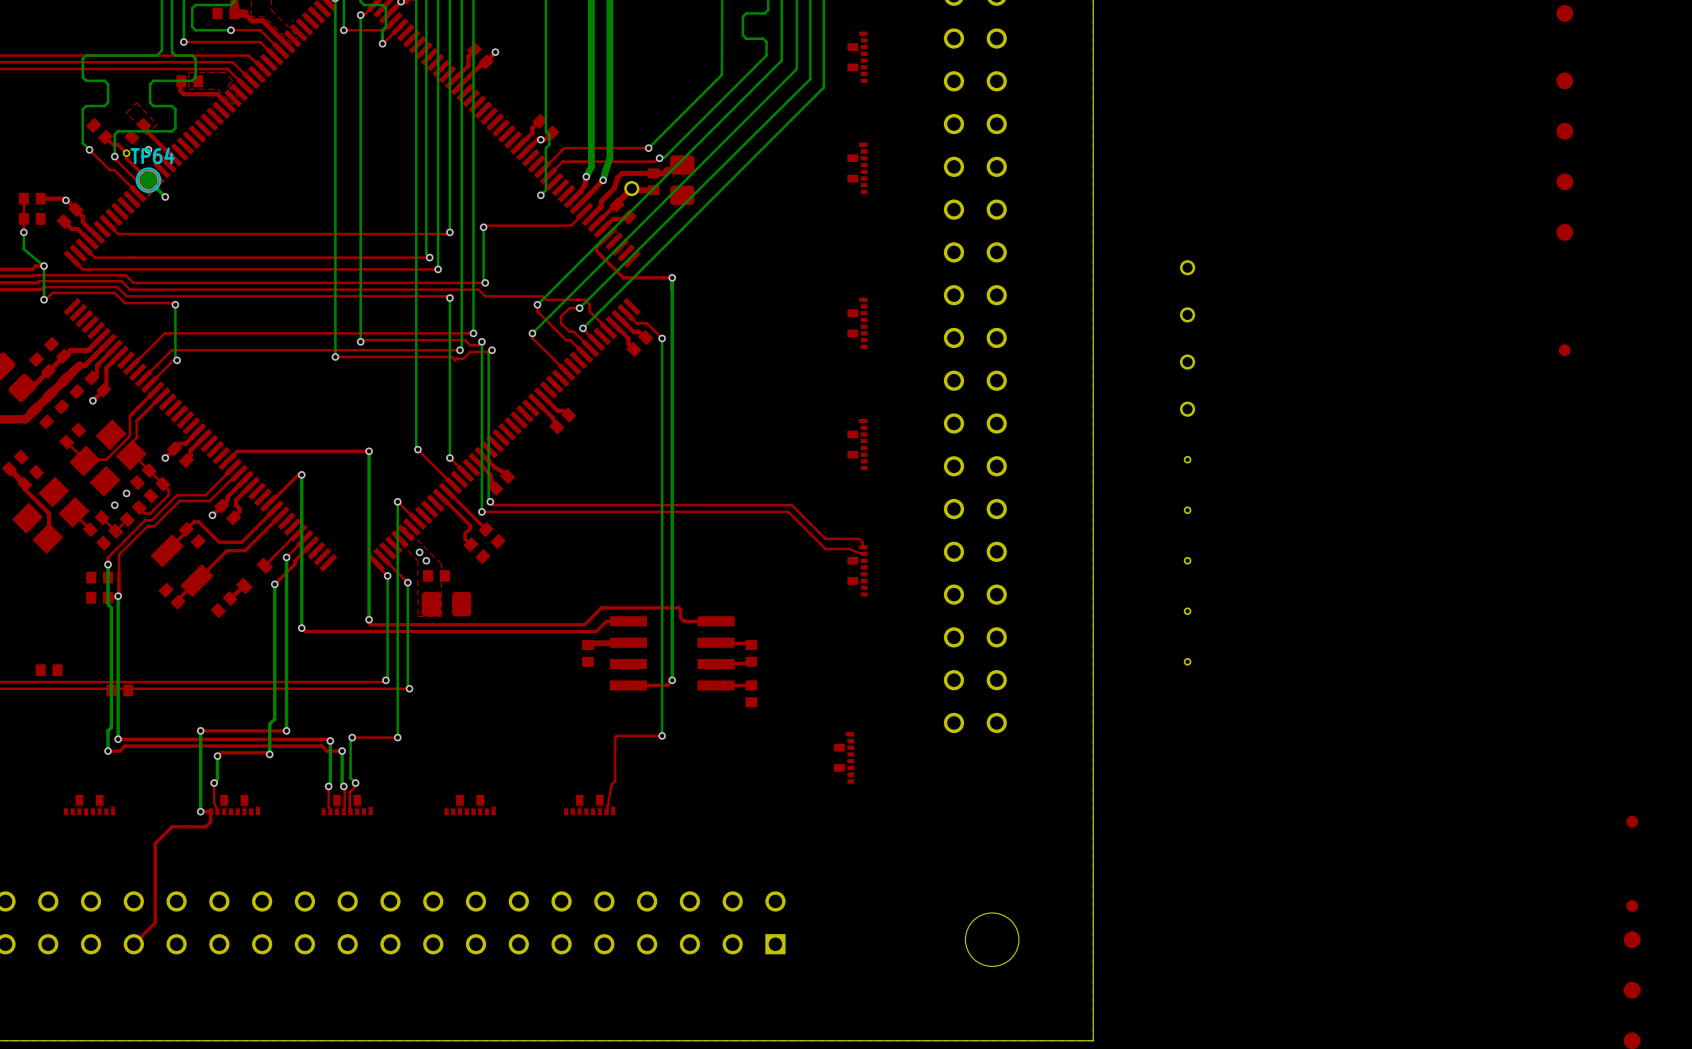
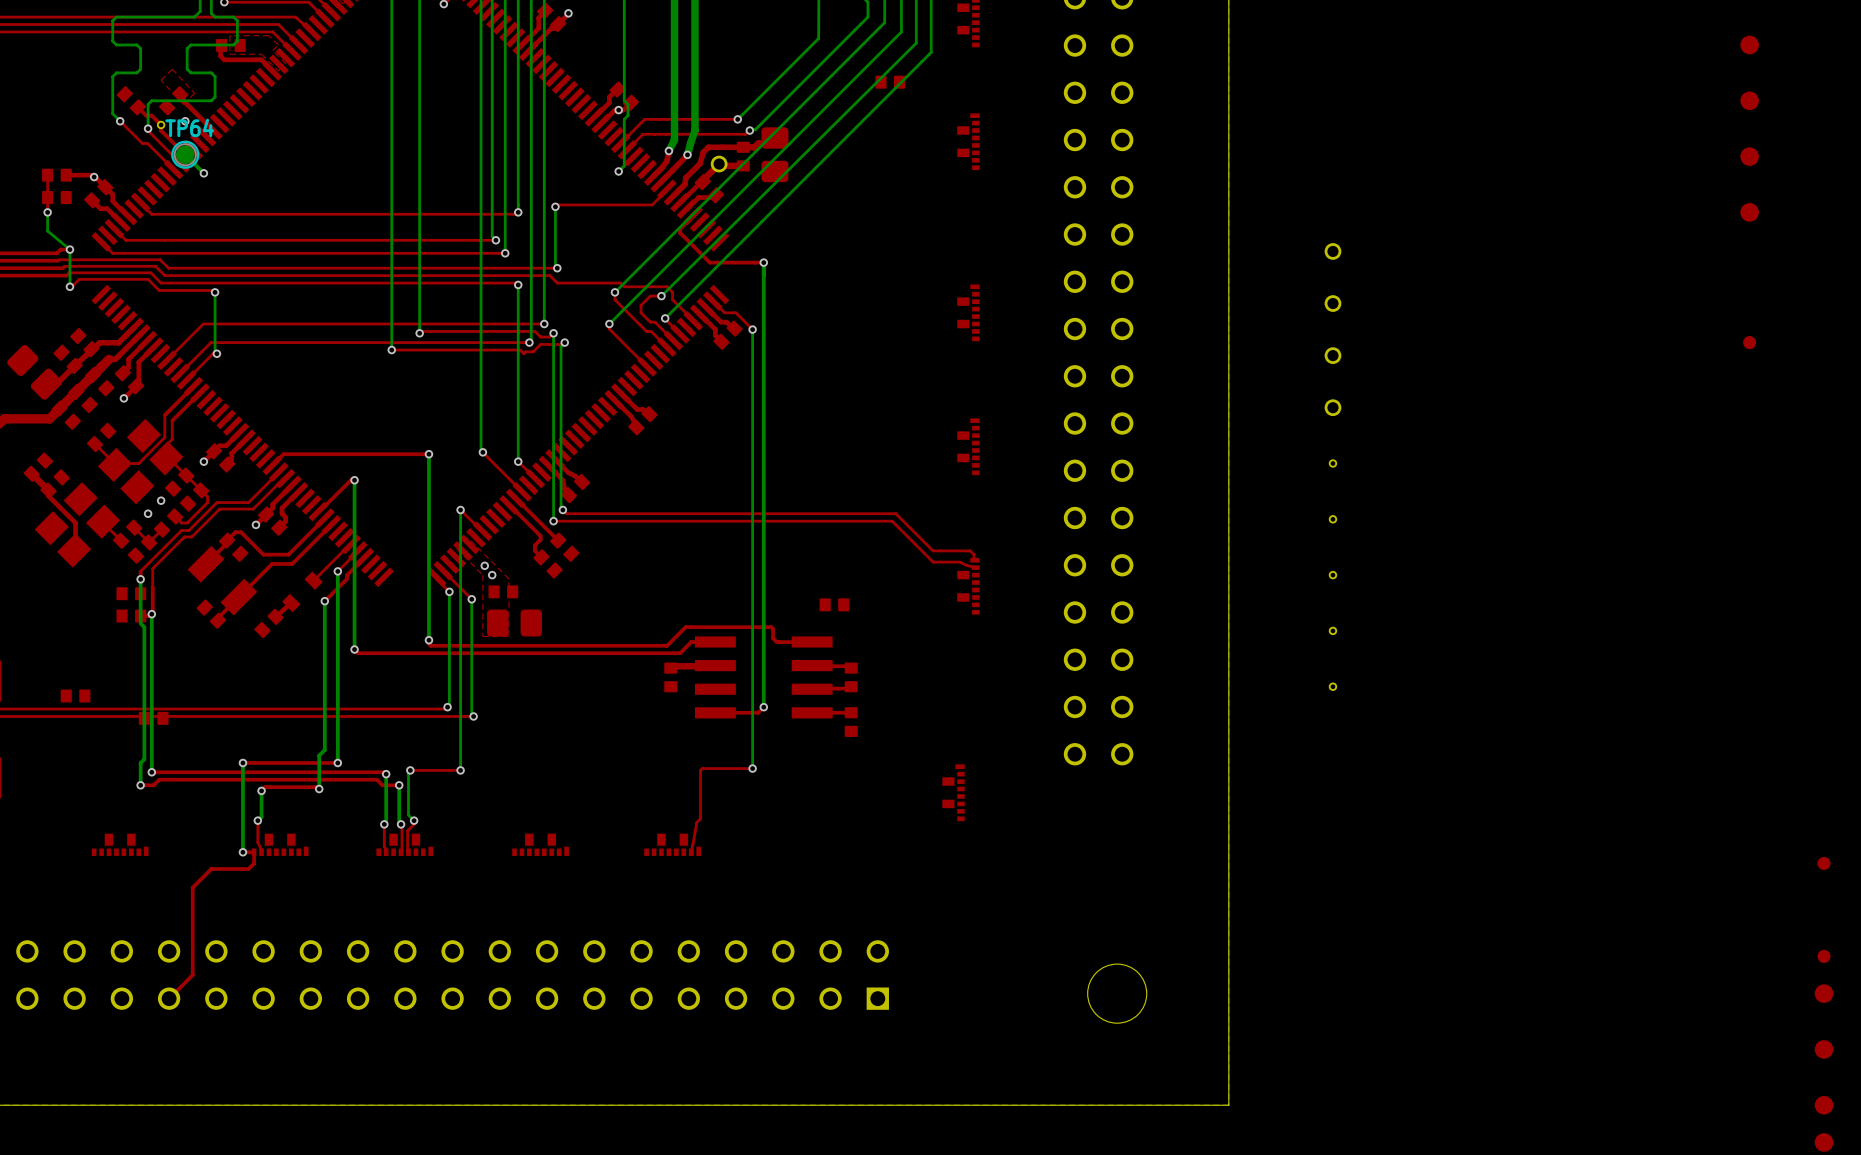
part: none -> (890, 82)
part: none -> (834, 604)

